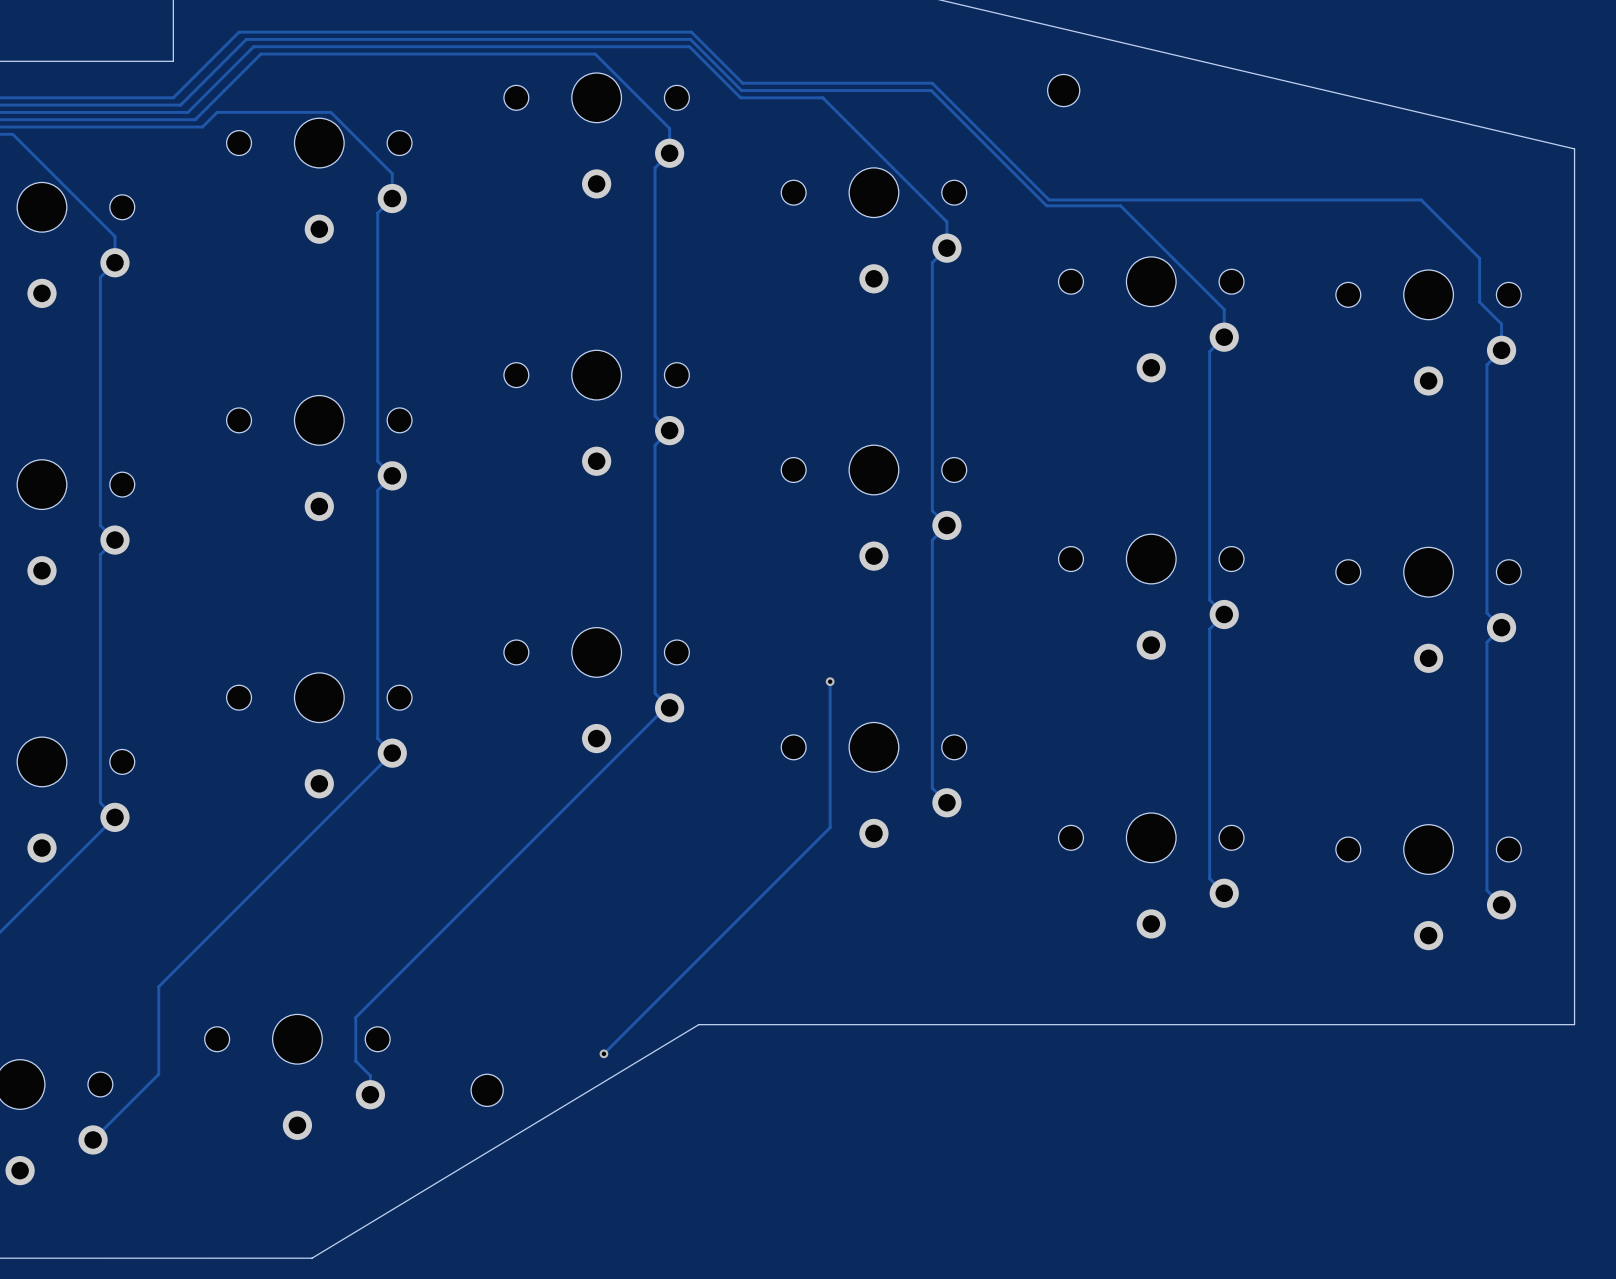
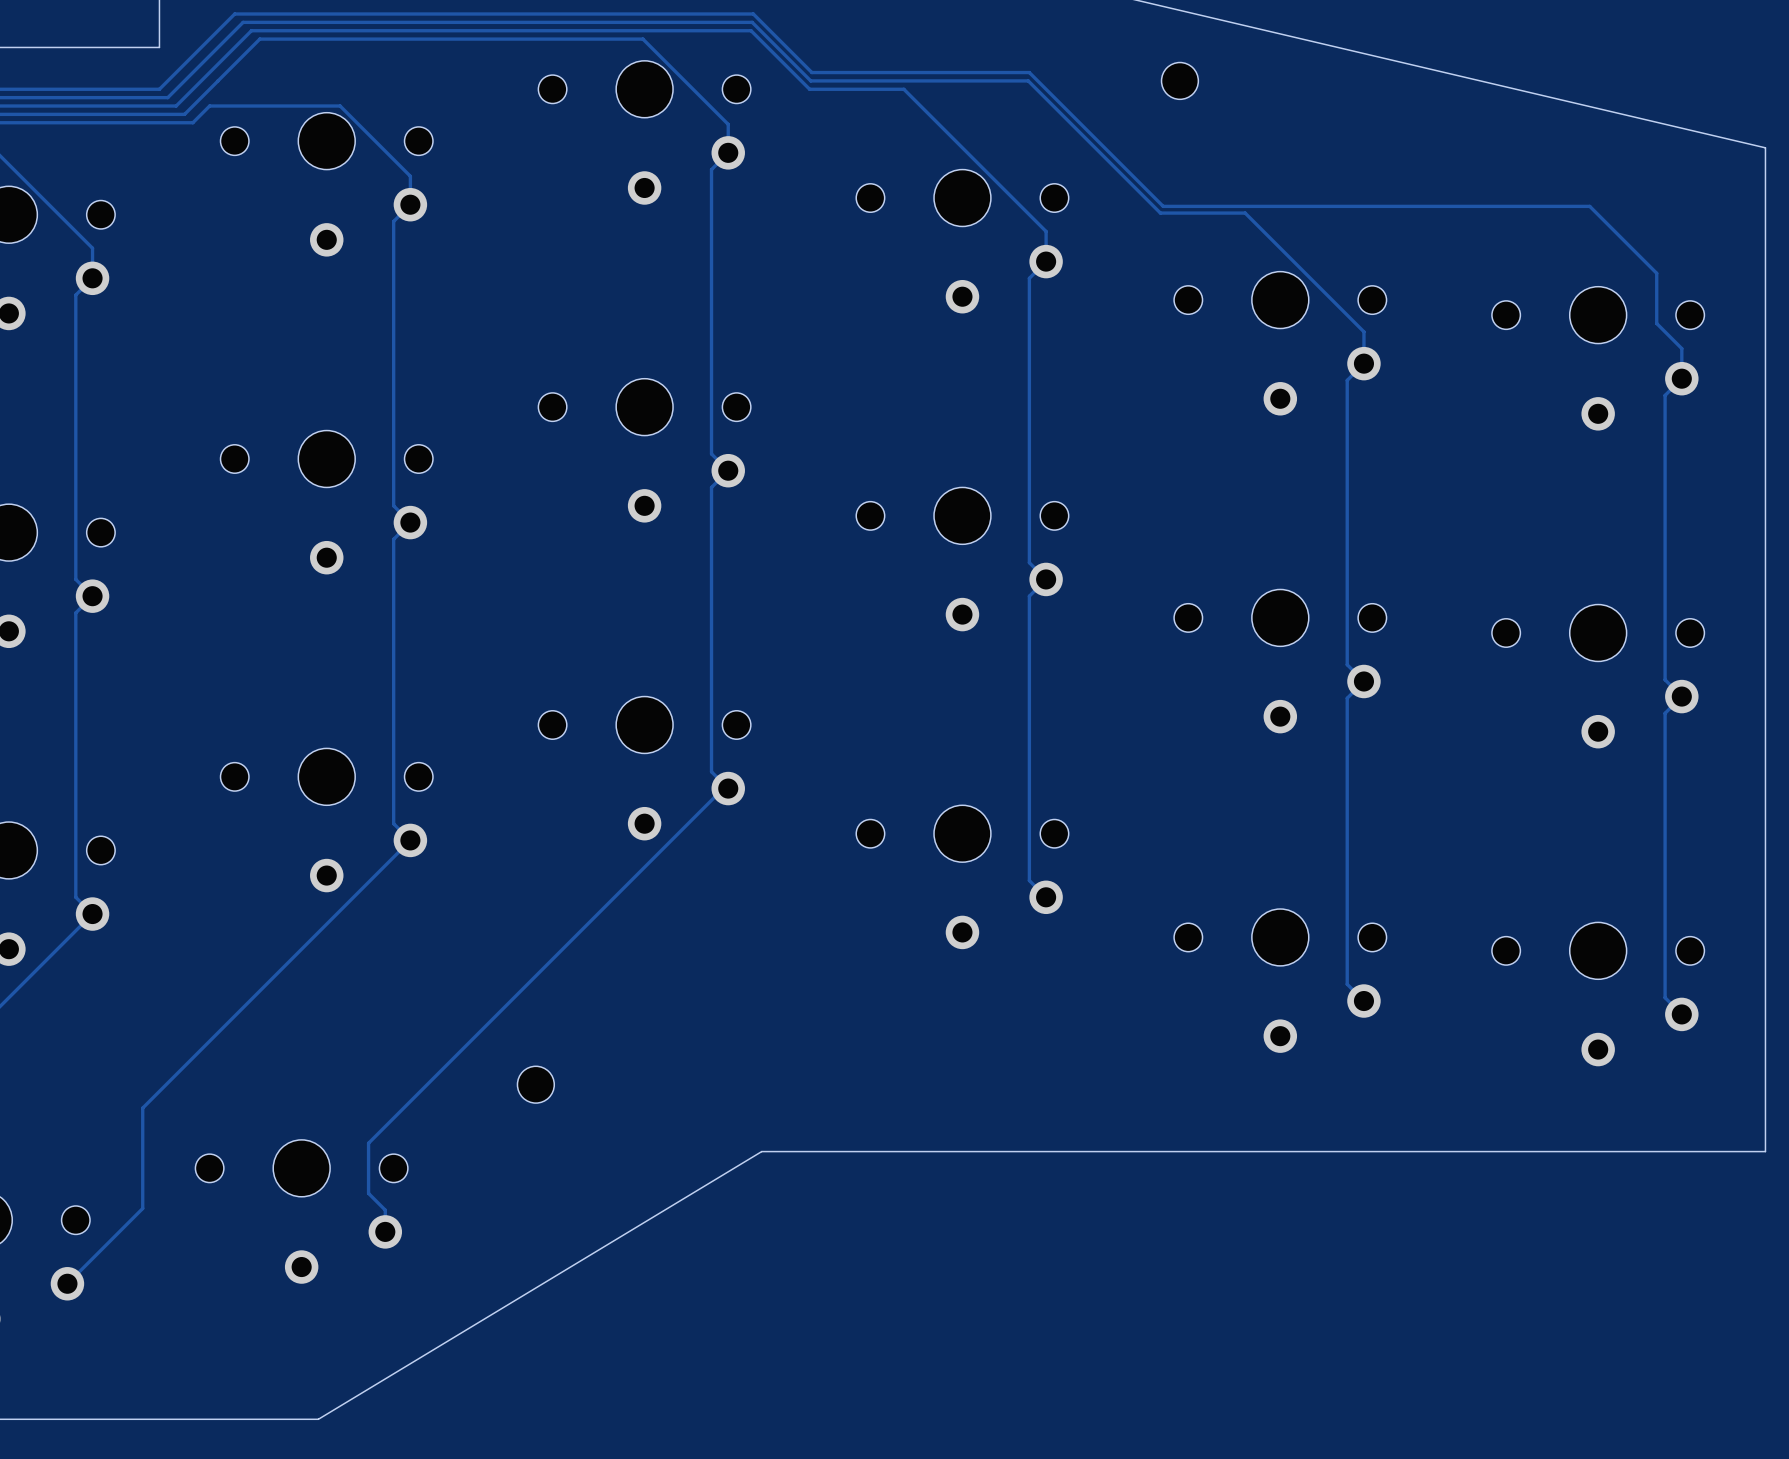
track: (830, 681) (830, 827) (603, 1053) -> none
via: (830, 681) -> none
via: (603, 1053) -> none
part position: (487, 1090) -> (535, 1084)

